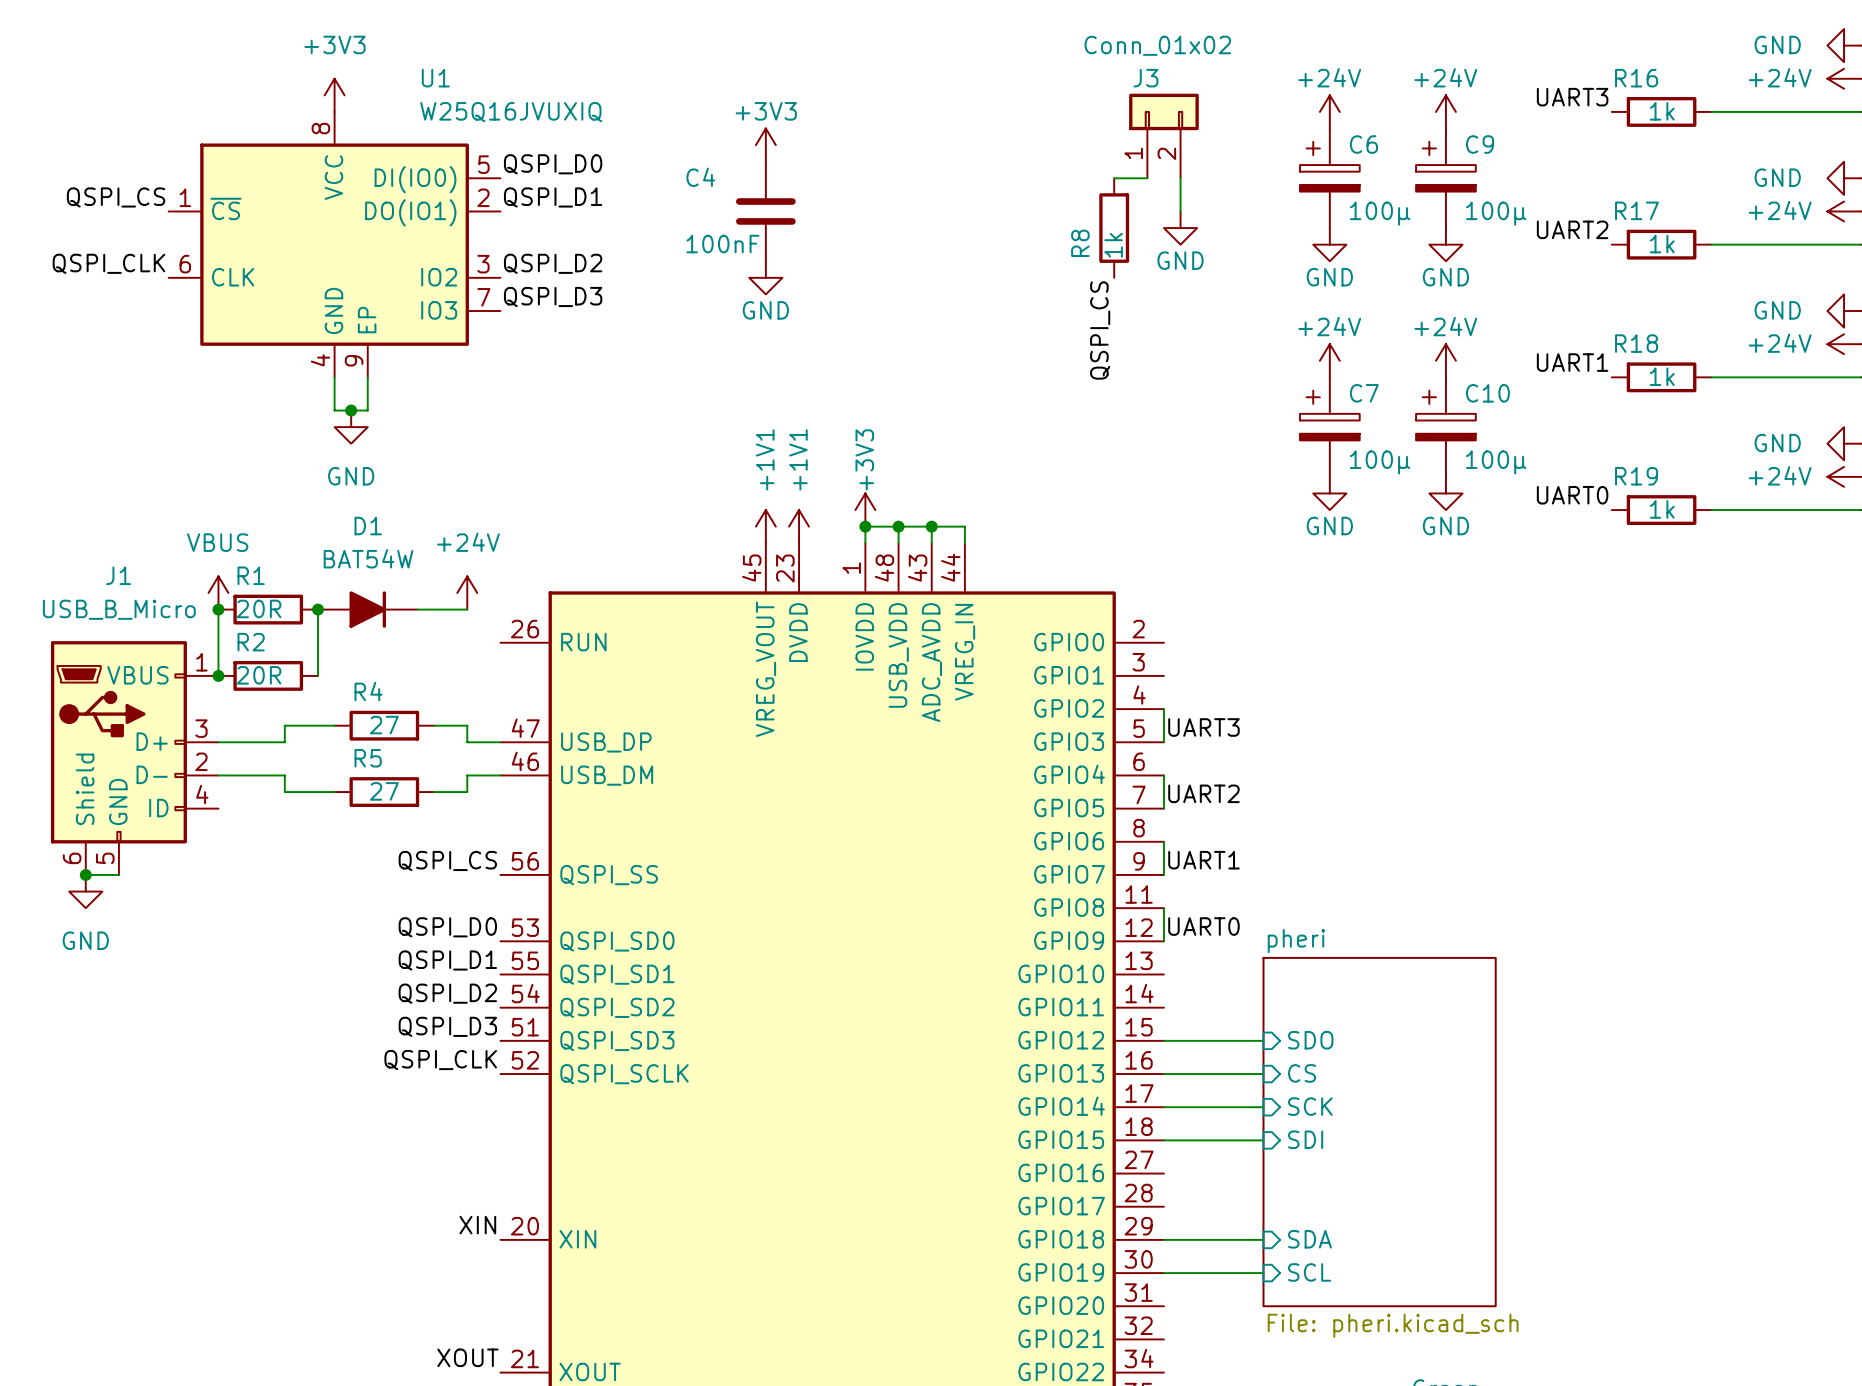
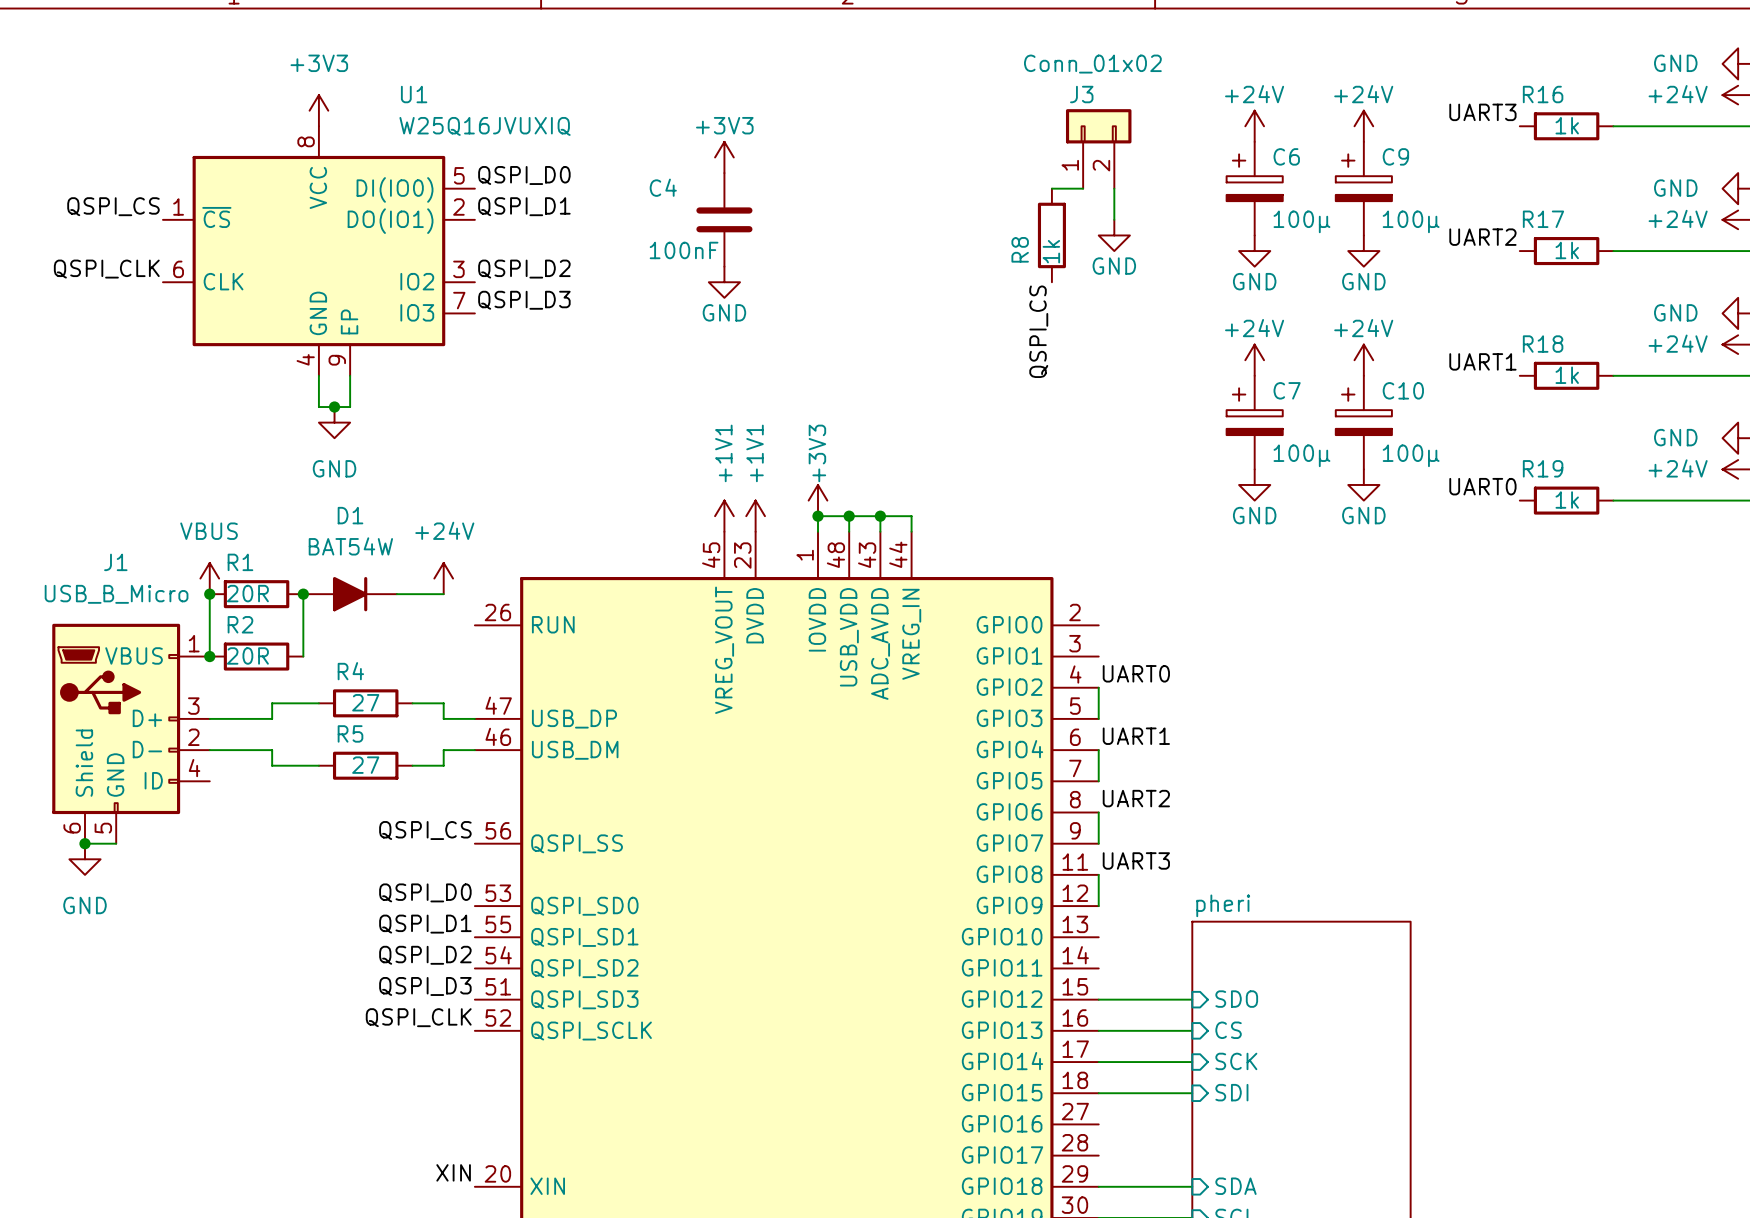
label position: UART3 (1203, 727) -> UART3 (1136, 860)
label position: UART2 (1203, 793) -> UART2 (1136, 798)
label position: UART1 (1203, 860) -> UART1 (1136, 736)
label position: UART0 (1203, 926) -> UART0 (1136, 673)

